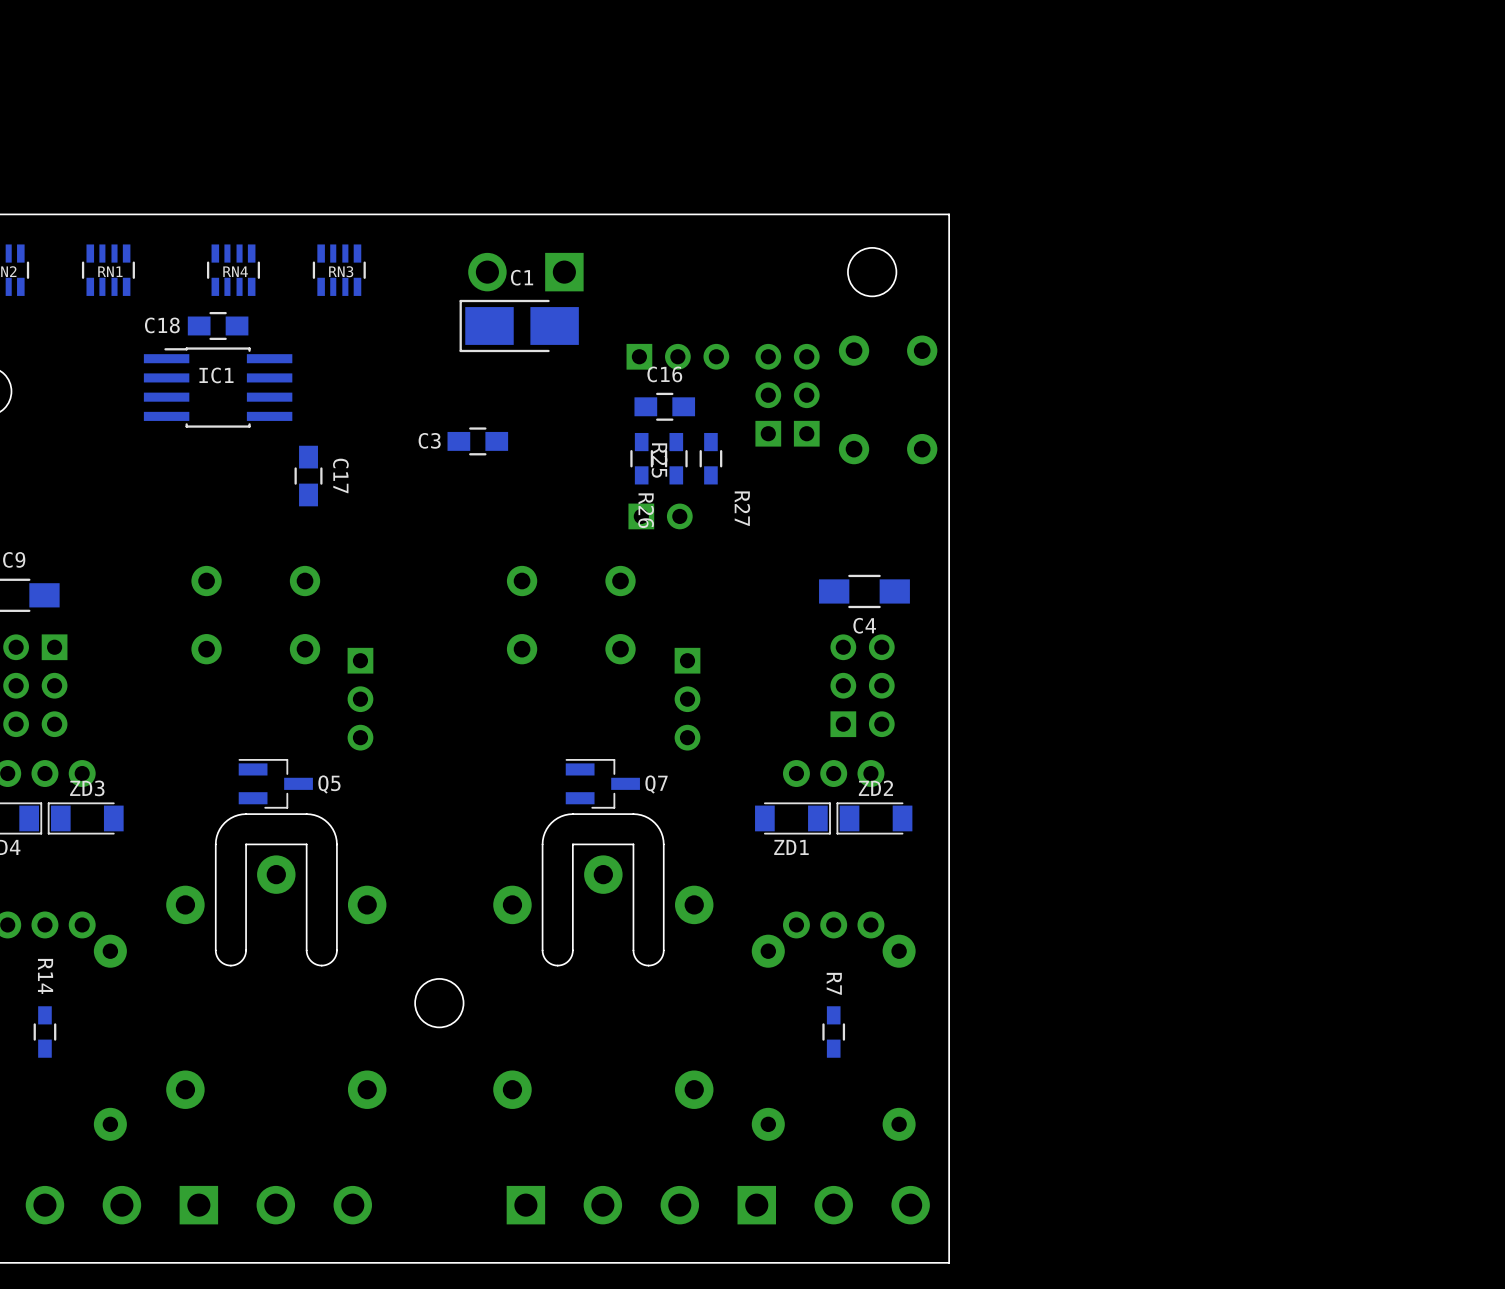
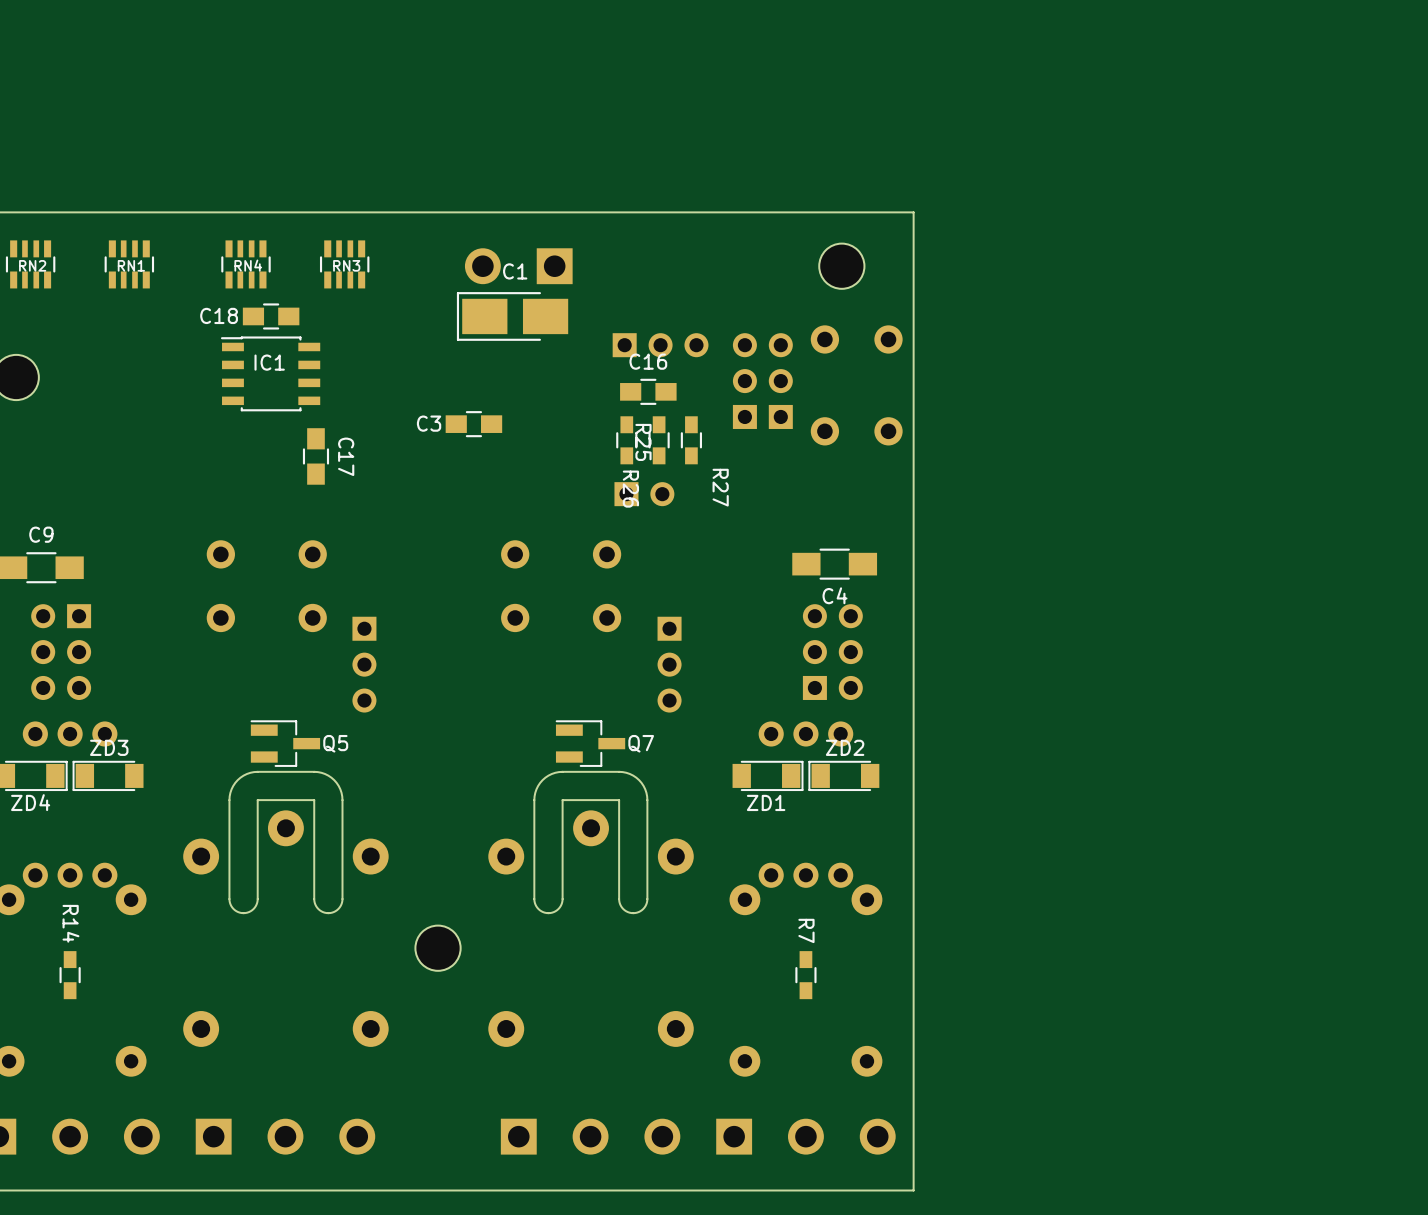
C18 position: (218, 325) -> (271, 316)
IC1 footprint: [143, 347, 293, 428] -> [220, 336, 321, 412]

